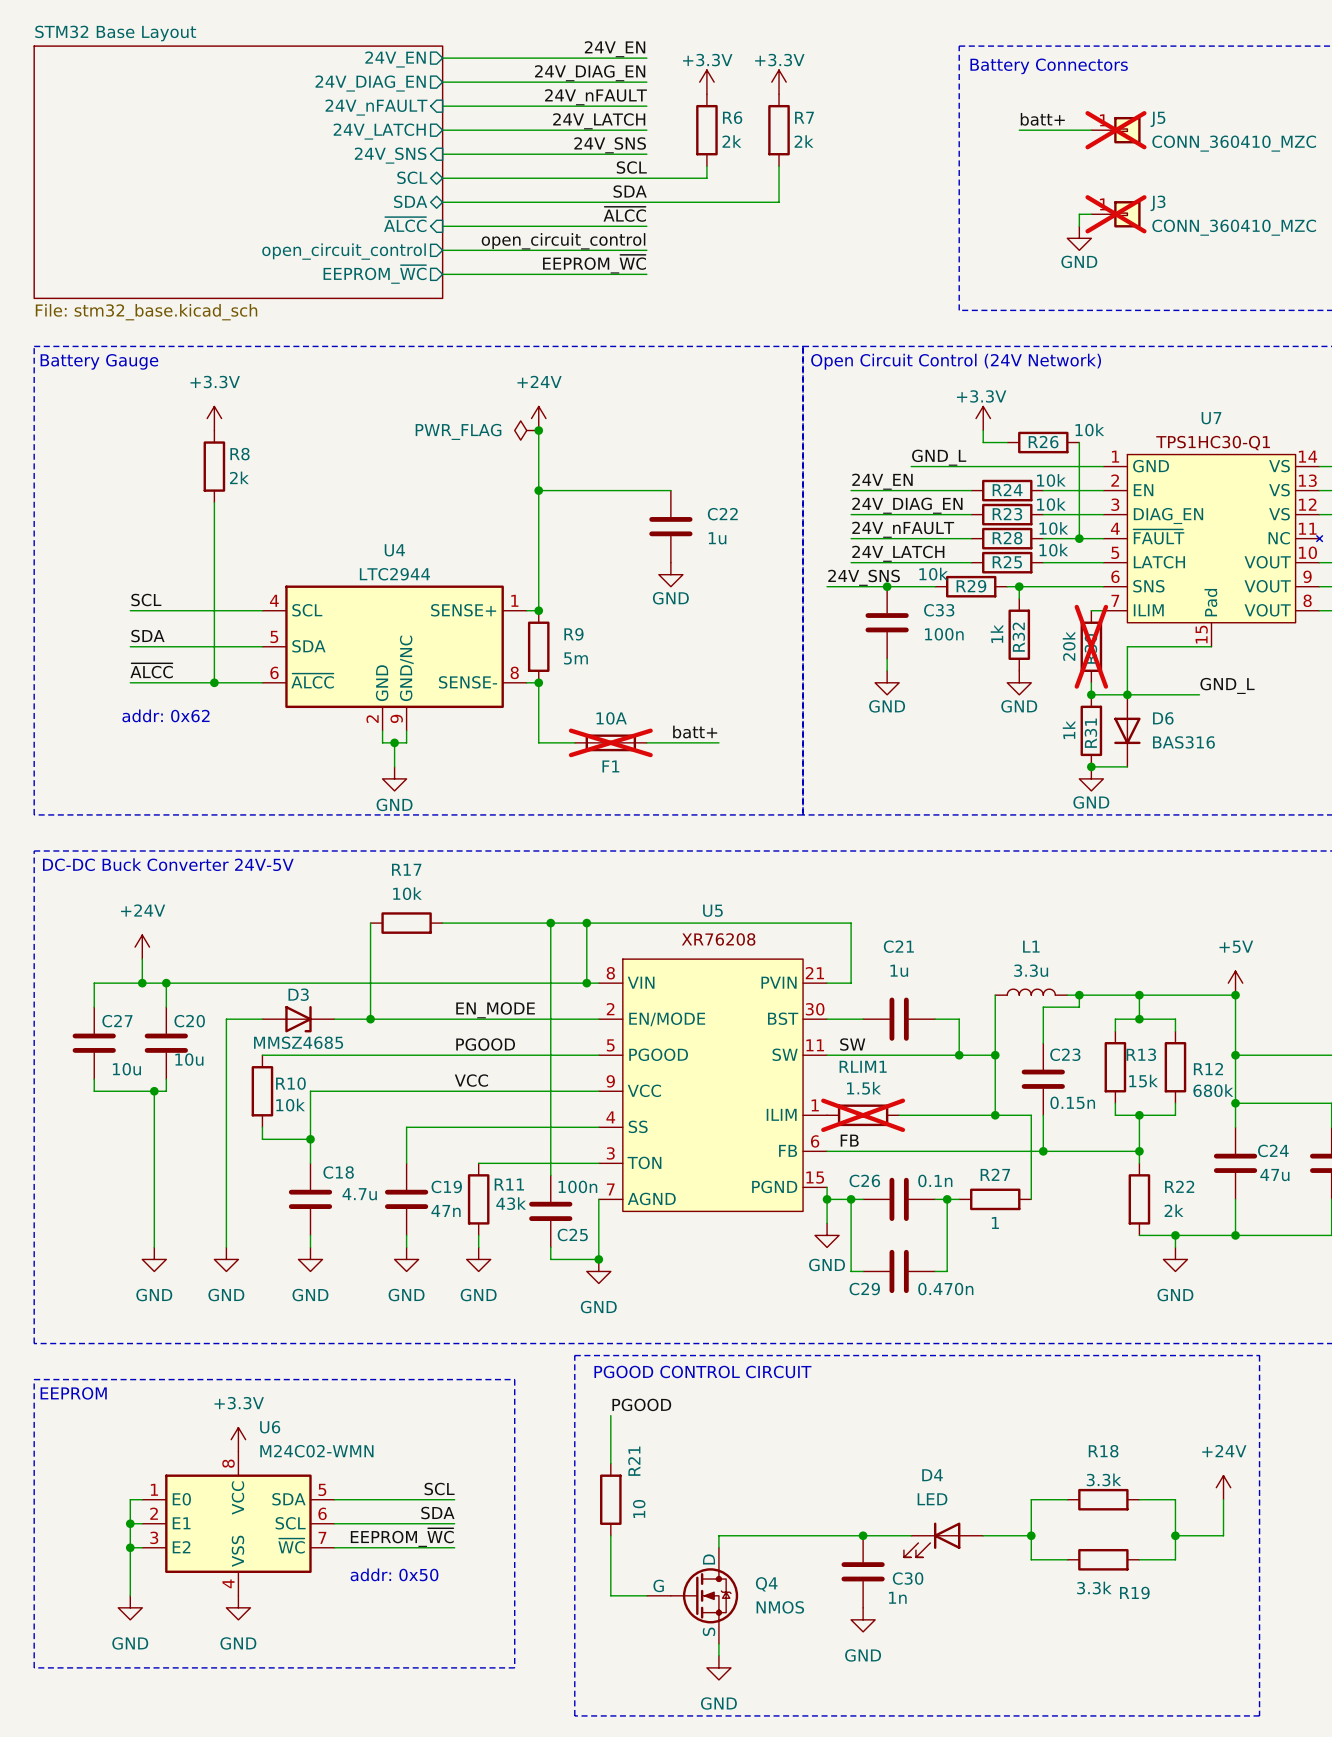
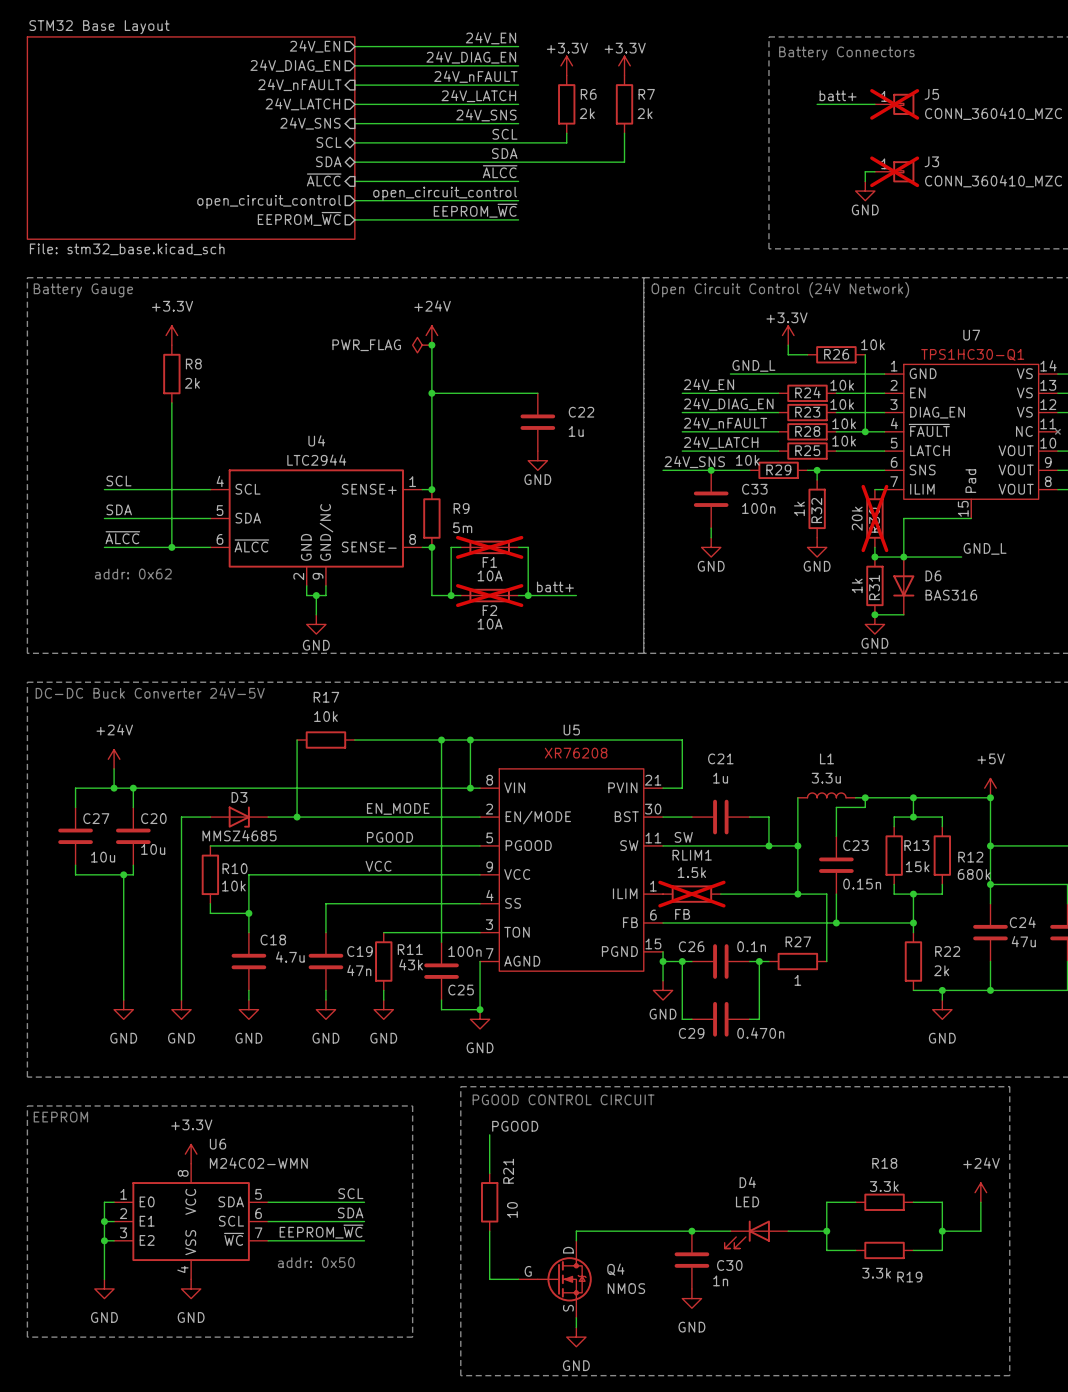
wire: none -> (460, 547) (451, 547) (451, 595)
F1: none -> 10A (489, 547)
wire: none -> (518, 547) (528, 547) (528, 595)
F1 value position: 10A (611, 718) -> 10A (490, 624)
junction: none -> (451, 595)
junction: none -> (528, 595)
F1 name: F1 (610, 766) -> F2 (489, 610)

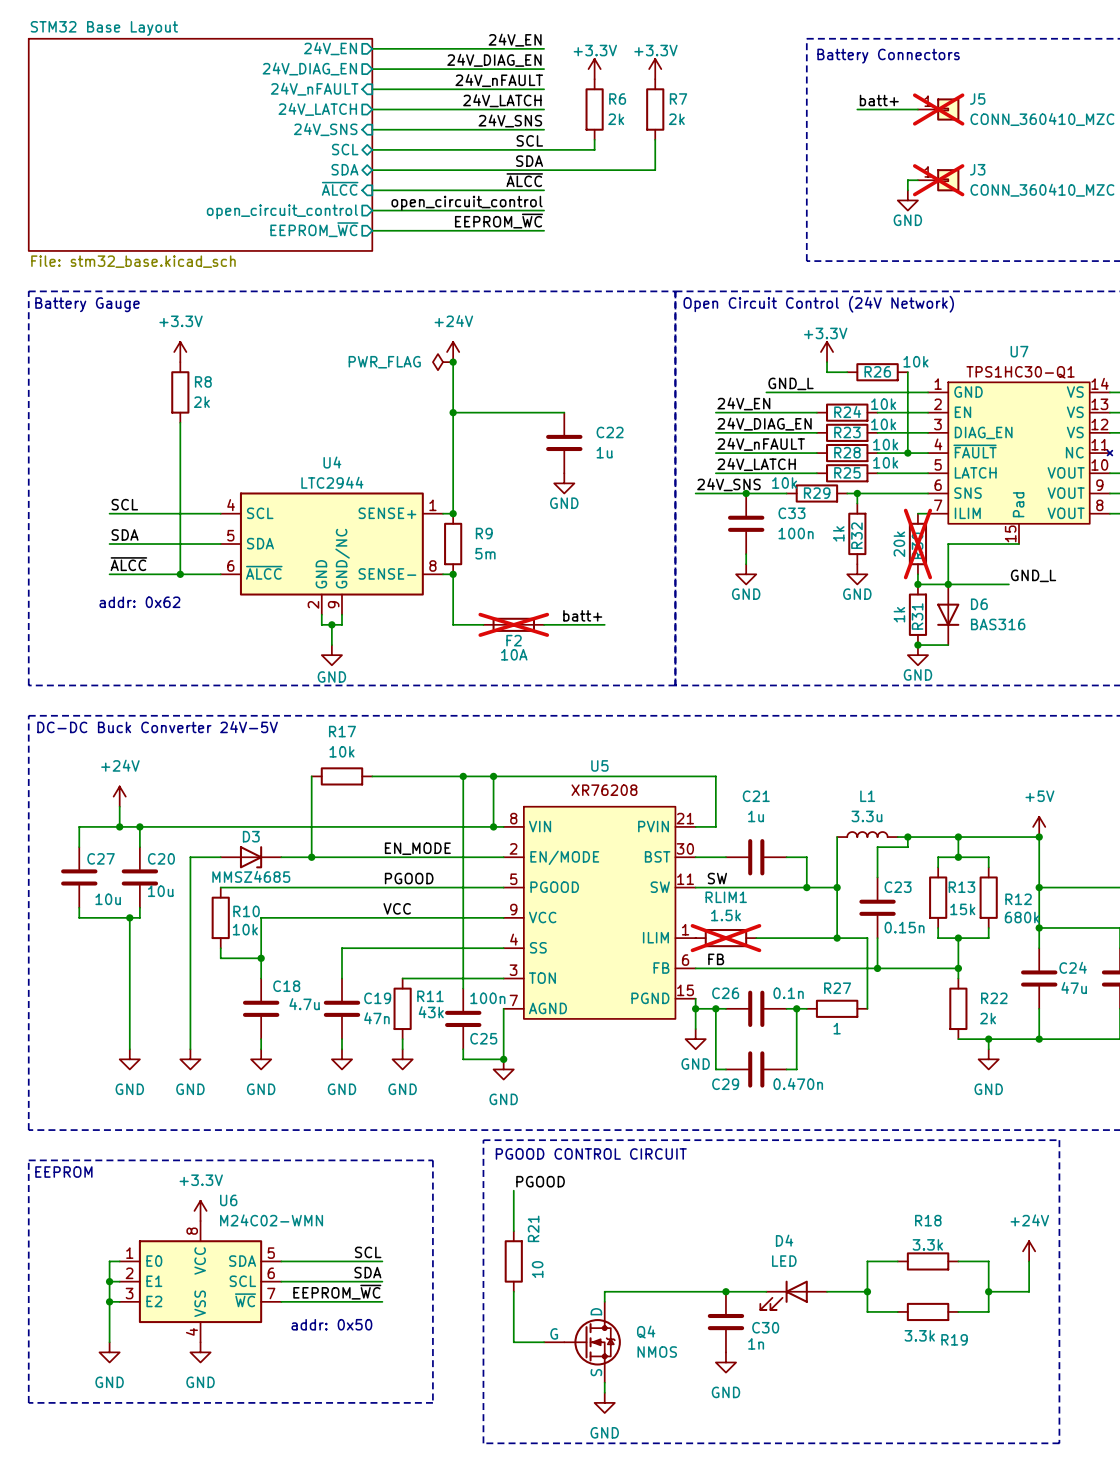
wire: (460, 547) (451, 547) (451, 595) -> none
F1: 10A (489, 547) -> none
wire: (518, 547) (528, 547) (528, 595) -> none
junction: (451, 595) -> none
junction: (528, 595) -> none

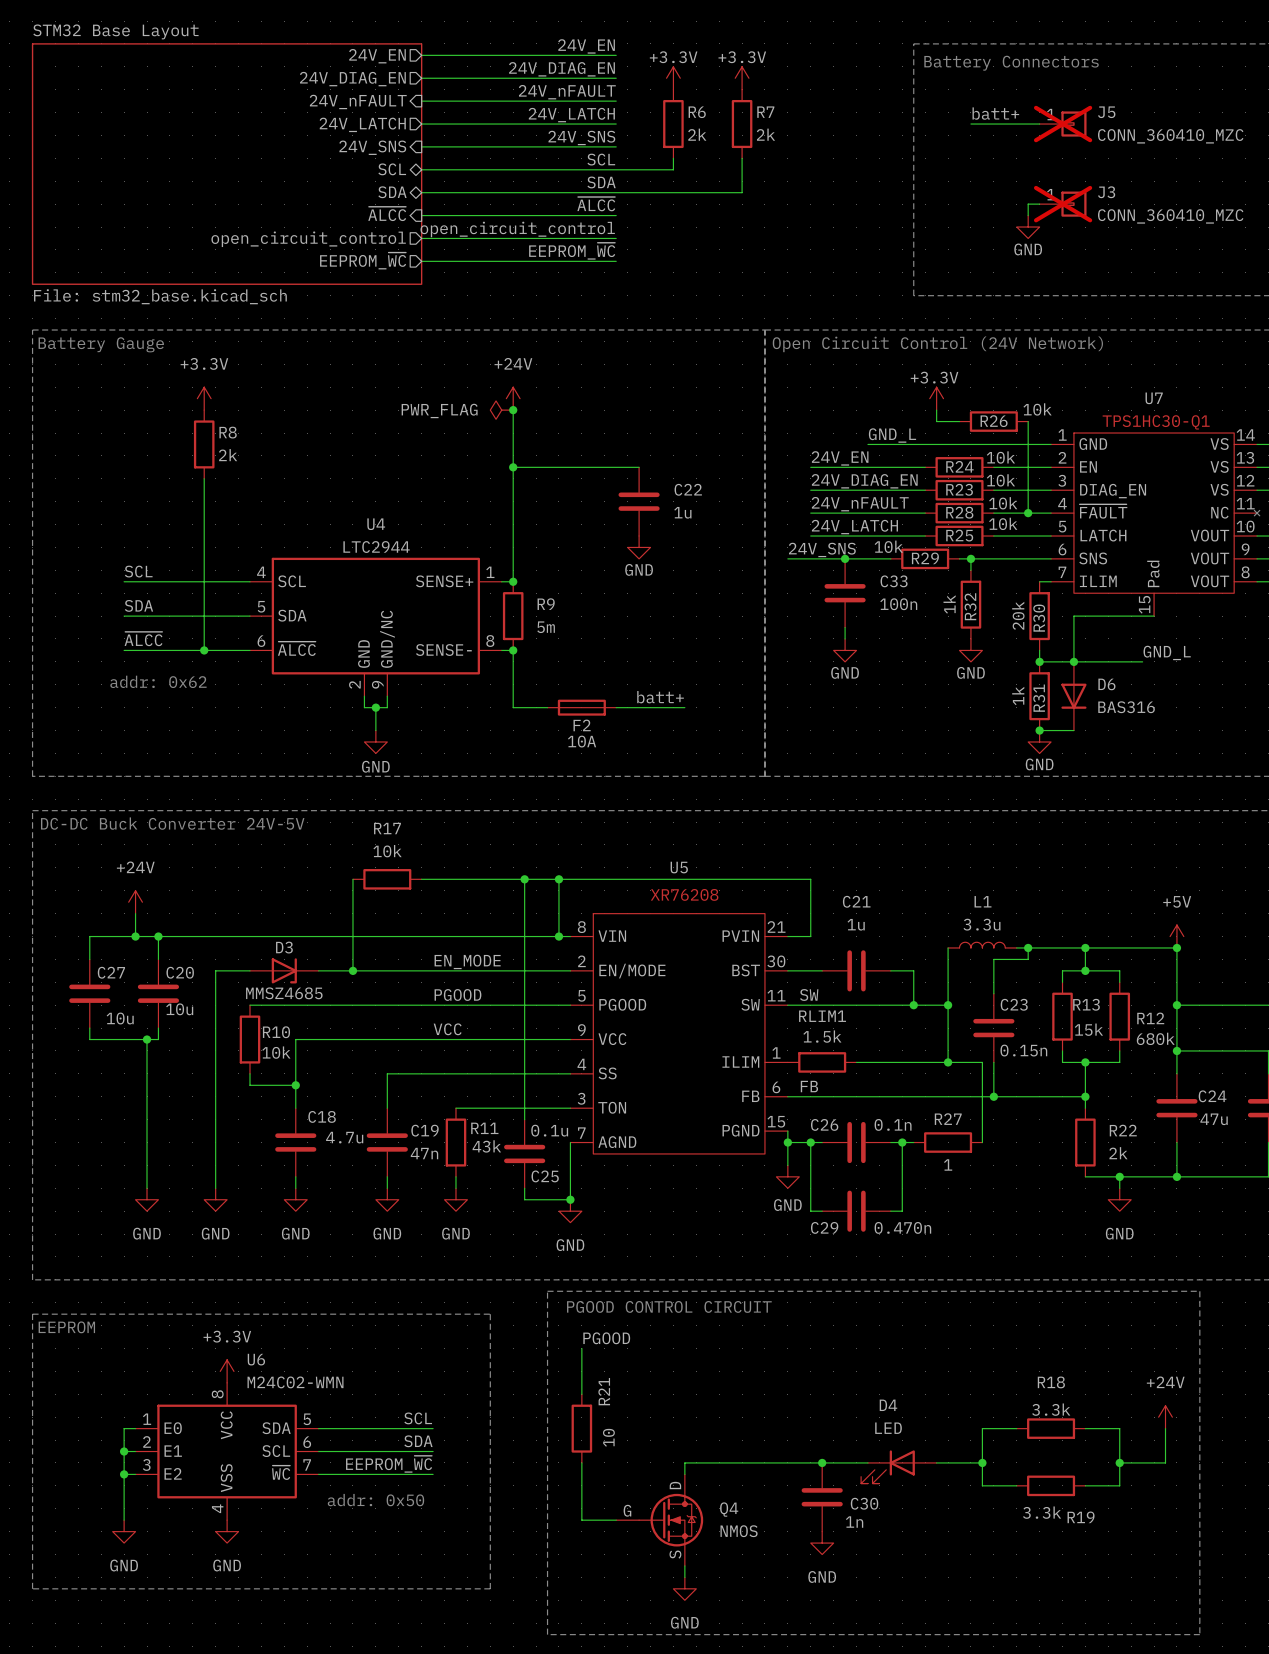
R30 do-not-place cross: (917, 544) -> none
F2 do-not-place cross: (513, 624) -> none
RLIM1 do-not-place cross: (725, 938) -> none
C25 value: 100n (487, 998) -> 0.1u (549, 1130)

